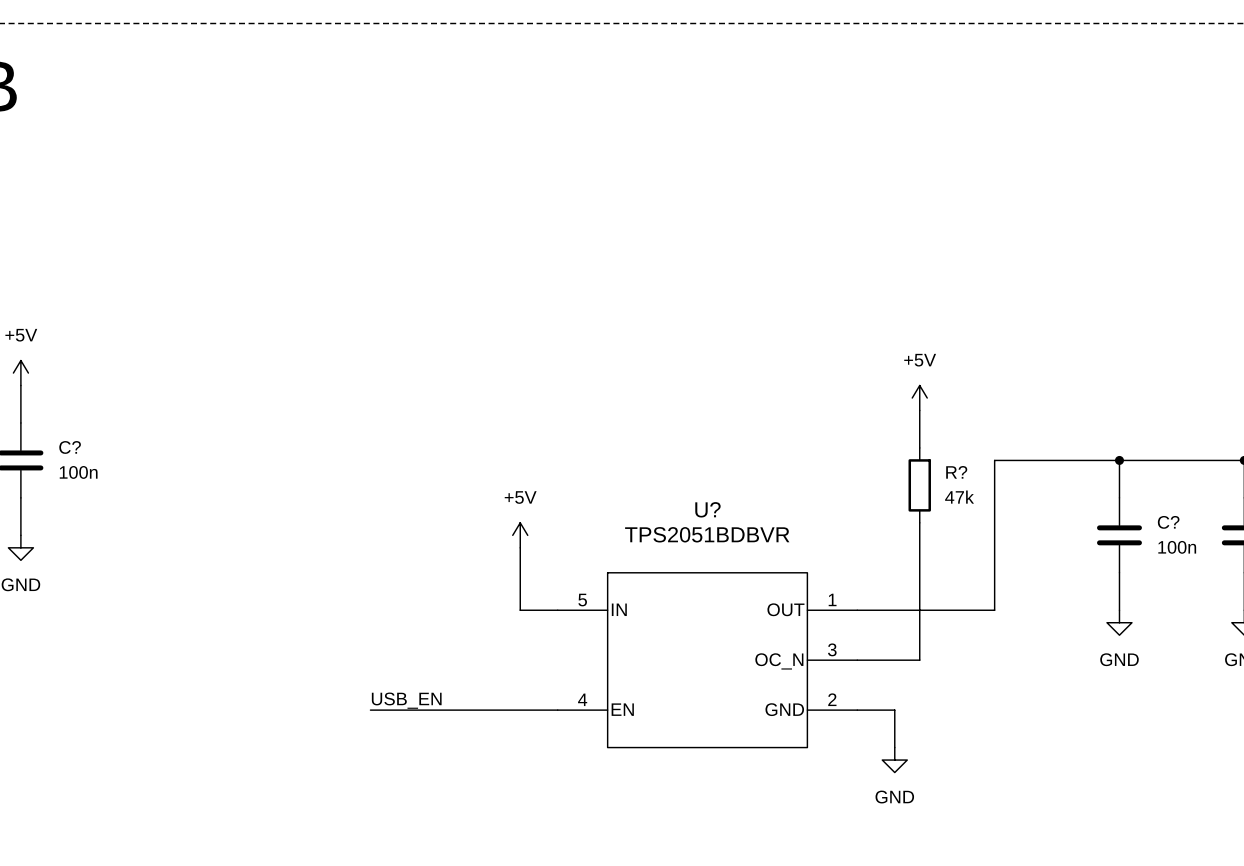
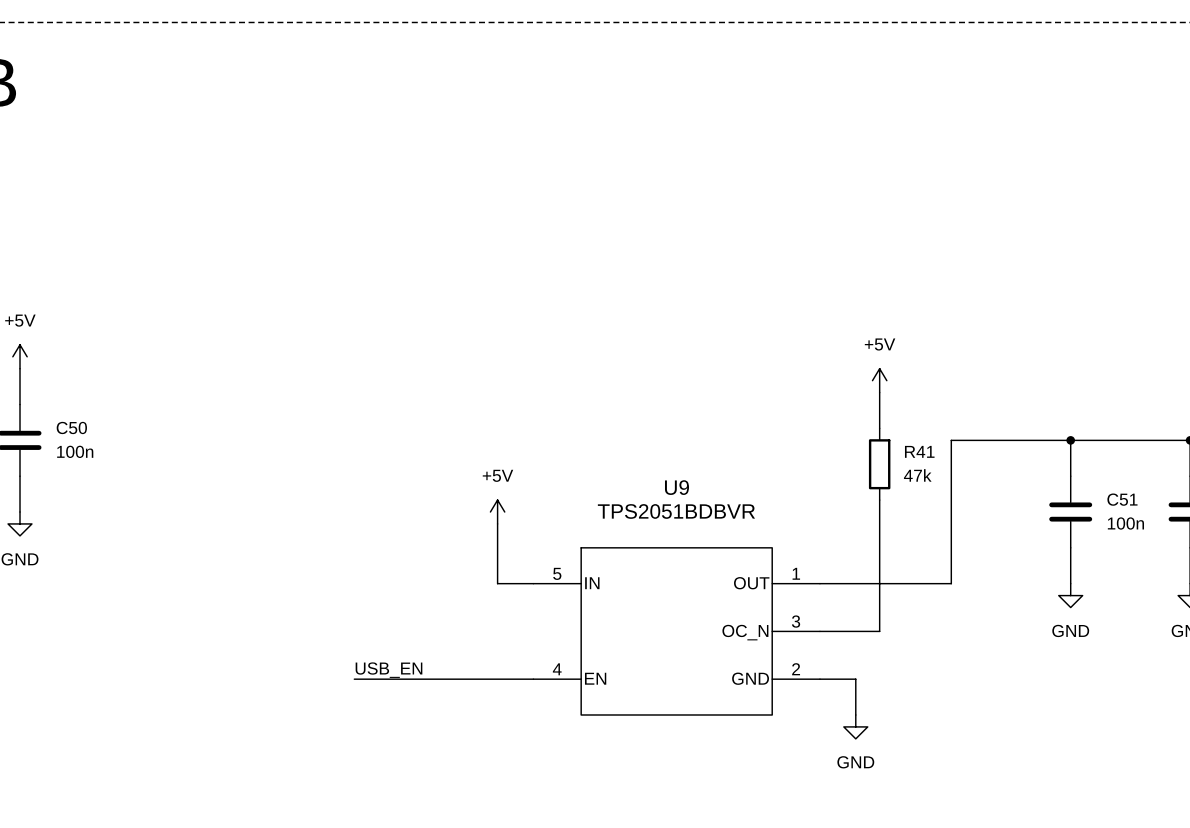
C? name: C? (70, 447) -> C50 (71, 427)
R? name: R? (956, 472) -> R41 (919, 451)
U? name: U? (707, 509) -> U9 (677, 487)
C? name: C? (1168, 522) -> C51 (1122, 499)

